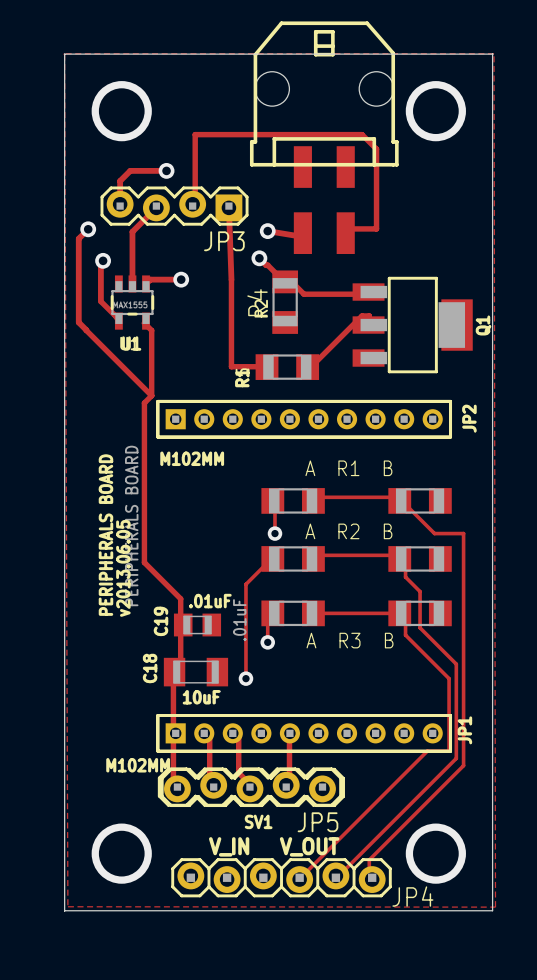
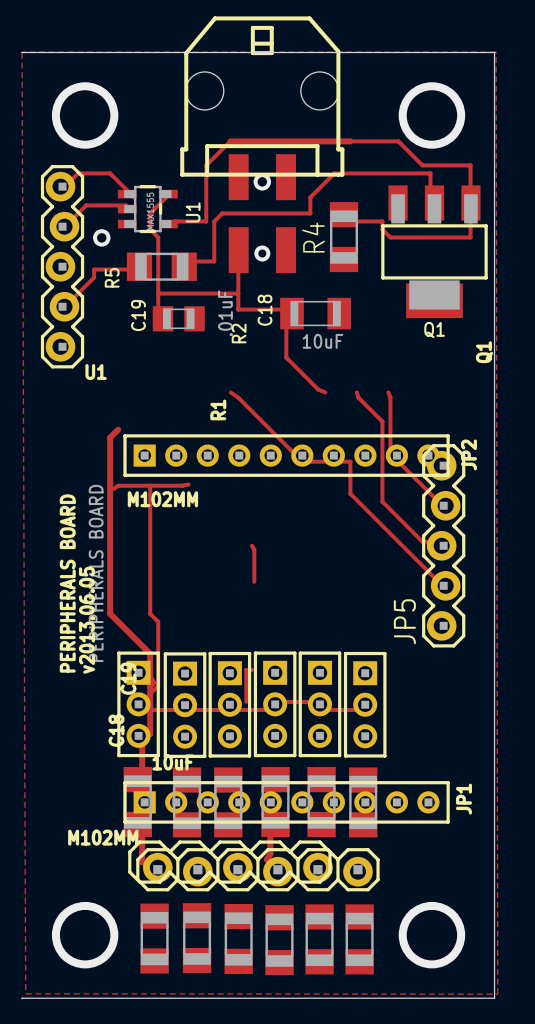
board edge: (64, 54) (64, 910) -> none
track: (253, 134) (195, 134) (195, 199) (192, 204) -> (230, 141) (206, 165) (206, 221) (174, 221) (168, 224)
track: (362, 134) (376, 149) (376, 228) (347, 228) (345, 233) -> (350, 141) (398, 141) (422, 165) (470, 165) (470, 237) (390, 237) (382, 229) (382, 221) (350, 221) (344, 214)
part position: (324, 137) -> (262, 144)
track: (166, 170) (130, 170) (120, 181) (120, 204) -> none
via: (166, 170) -> none
via: none -> (262, 181)
track: none -> (60, 186) (62, 189) (78, 173) (110, 173) (134, 197) (127, 194)
track: none -> (168, 194) (150, 213) (150, 229) (158, 237) (158, 317) (163, 318)
track: none -> (434, 203) (430, 197) (430, 173) (334, 173) (310, 197) (310, 213) (222, 213) (214, 221) (214, 261) (190, 261) (184, 266)
track: none -> (127, 209) (126, 205) (86, 205) (64, 226)
JP3: (174, 206) -> none
track: (156, 207) (132, 231) (132, 283) -> none
track: (228, 207) (231, 366) (267, 367) -> none
via: none -> (101, 237)
track: (267, 228) (267, 231) (296, 236) (302, 233) -> none
track: (88, 229) (78, 238) (78, 322) (151, 395) (151, 330) (144, 323) (146, 321) -> none
via: (88, 229) -> none
via: (267, 231) -> none
track: none -> (238, 250) (238, 309) (286, 309) (291, 313) (286, 317) (286, 357) (318, 389) (325, 392)
via: none -> (262, 253)
part: none -> (62, 266)
track: none -> (139, 266) (134, 269) (94, 269) (94, 277) (64, 306)
track: (259, 258) (282, 279) (285, 281) (289, 279) (304, 294) (362, 294) (368, 292) -> none
via: (259, 258) -> none
track: (103, 260) (100, 263) (100, 301) (118, 321) -> none
via: (103, 260) -> none
track: none -> (158, 293) (238, 293)
track: (181, 279) (150, 279) (146, 283) -> none
via: (181, 279) -> none
U1 rotation: 0° (132, 302) -> 90° counterclockwise (147, 209)
U1 position: (132, 302) -> (147, 209)
R4 position: (285, 302) -> (344, 237)
track: (368, 325) (369, 315) (362, 315) (311, 366) (307, 367) -> none
Q1 rotation: 0° (412, 325) -> 90° clockwise (434, 251)
Q1 position: (412, 325) -> (434, 251)
track: none -> (230, 392) (238, 397) (302, 461) (350, 461) (350, 493) (438, 581) (445, 585)
track: none -> (356, 392) (358, 397) (382, 421) (382, 501) (422, 541) (438, 541) (441, 545)
track: none -> (388, 392) (390, 397) (390, 453) (438, 501) (445, 505)
R5 position: (287, 367) -> (161, 266)
line: (157, 401) (157, 437) (450, 437) (450, 401) (157, 401) -> none
track: none -> (188, 484) (118, 485) (114, 488)
track: none -> (150, 485) (150, 613) (158, 621) (158, 685) (138, 704) (142, 709) (182, 709) (185, 705) (190, 709) (222, 709) (229, 704) (230, 709) (270, 709) (278, 701) (318, 701) (326, 709) (358, 709) (365, 704)
text: A R1 B (348, 468) -> none
part: (293, 500) -> none
track: (313, 500) (318, 497) (398, 497) (399, 500) -> none
track: (399, 500) (434, 533) (463, 533) (463, 765) (369, 859) (369, 874) (372, 879) -> none
part: (420, 500) -> none
text: A R2 B (348, 531) -> none
via: (274, 533) -> none
track: (272, 558) (245, 584) (245, 678) -> none
part: (293, 558) -> none
track: (313, 558) (318, 555) (398, 555) (399, 558) (405, 562) (405, 577) (420, 591) (420, 627) (456, 664) (456, 758) (340, 874) (335, 875) -> none
part: (420, 558) -> none
text: .01uF (210, 601) -> none
part: (293, 613) -> none
track: (313, 613) (405, 613) (405, 635) (449, 678) (449, 751) (427, 751) (299, 879) -> none
part: (420, 613) -> none
C19 position: (197, 625) -> (178, 318)
text: A R3 B (349, 640) -> none
via: (267, 642) -> none
part: none -> (138, 704)
part: none -> (229, 704)
part: none -> (275, 704)
part: none -> (319, 704)
part: none -> (365, 704)
part: none -> (185, 705)
C18 position: (195, 672) -> (315, 313)
via: (245, 678) -> none
line: (157, 715) (450, 715) (450, 751) (157, 751) (157, 715) -> none
part: none -> (137, 802)
track: (204, 733) (209, 736) (209, 780) (213, 785) -> none
part: none -> (187, 802)
track: (232, 733) (238, 736) (238, 772) (245, 780) (245, 787) (249, 788) -> none
part: none -> (228, 802)
part: none -> (275, 802)
part: none -> (321, 802)
part: none -> (363, 802)
JP5 rotation: 0° (249, 787) -> 90° clockwise (443, 545)
JP5 position: (249, 787) -> (443, 545)
part: none -> (257, 869)
text: SV1 (258, 821) -> none
text: V_IN V_OUT (274, 846) -> none
part: none -> (154, 938)
part: none -> (197, 938)
part: none -> (238, 938)
part: none -> (319, 939)
part: none -> (359, 939)
part: none -> (279, 940)
JP4: (281, 877) -> none

